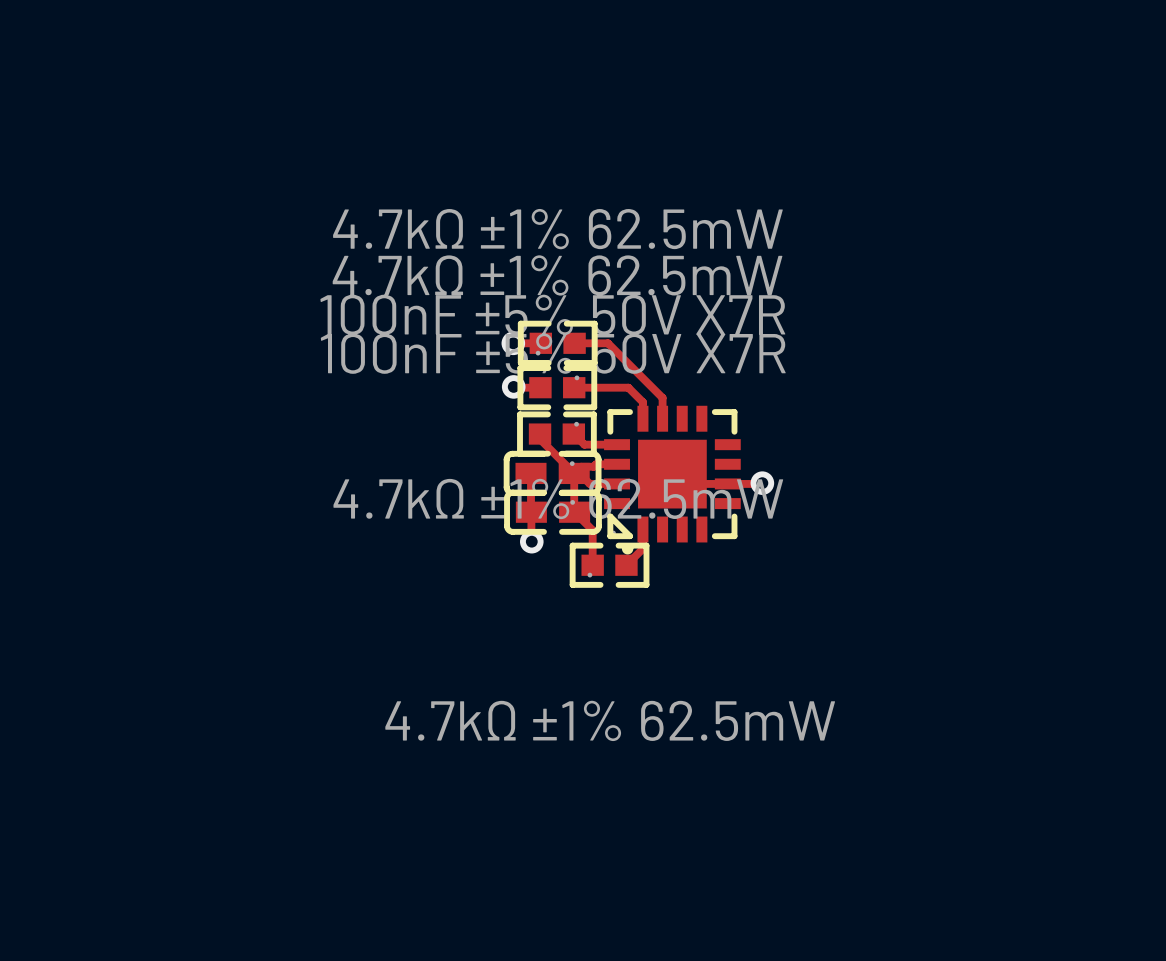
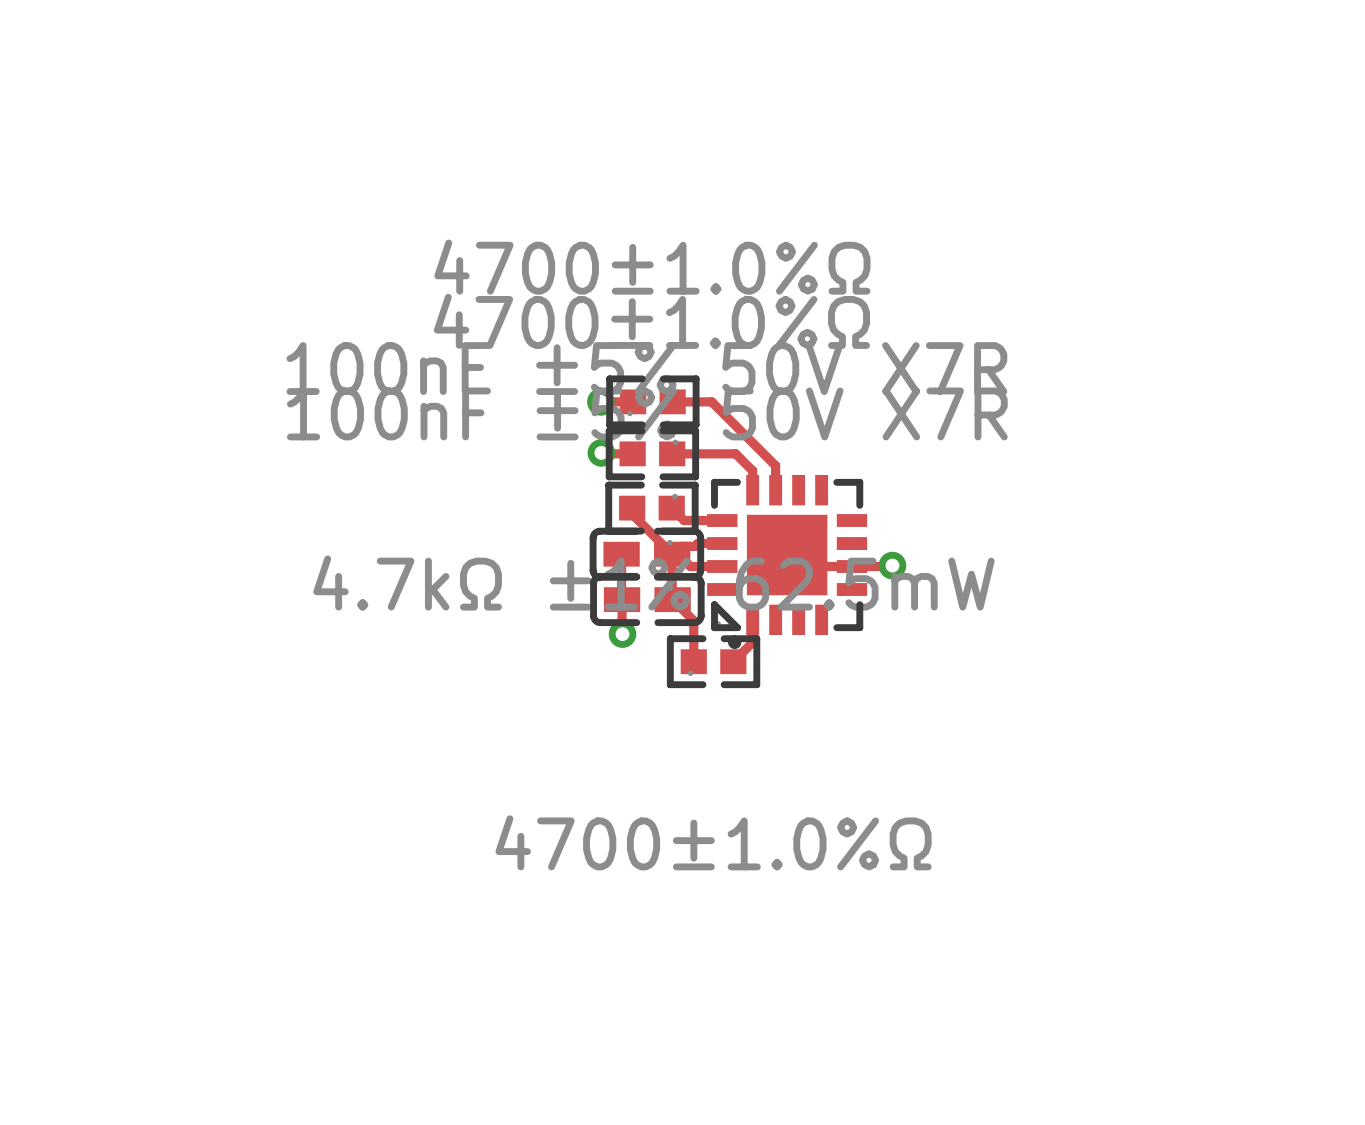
part value: 4.7kΩ ±1% 62.5mW (557, 229) -> 4700±1.0%Ω (652, 267)
part value: 4.7kΩ ±1% 62.5mW (557, 275) -> 4700±1.0%Ω (651, 321)
part value: 4.7kΩ ±1% 62.5mW (610, 720) -> 4700±1.0%Ω (713, 842)

